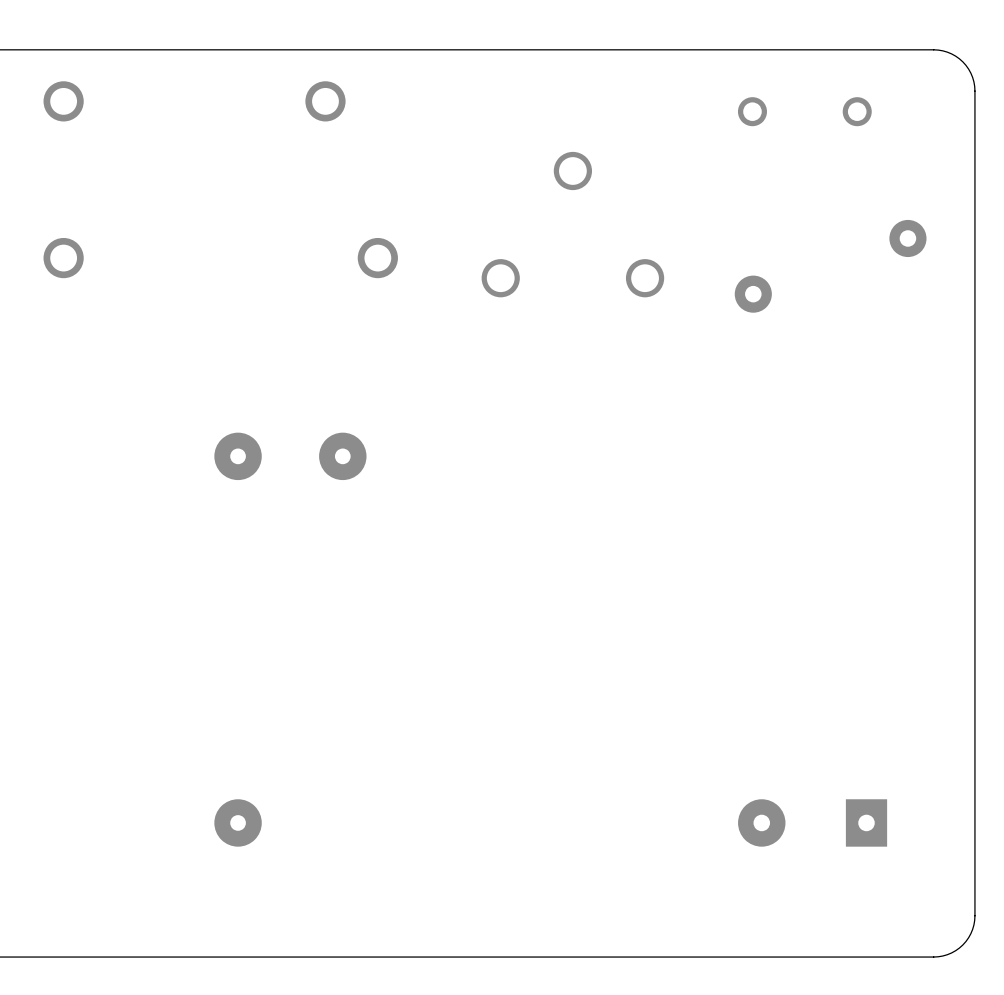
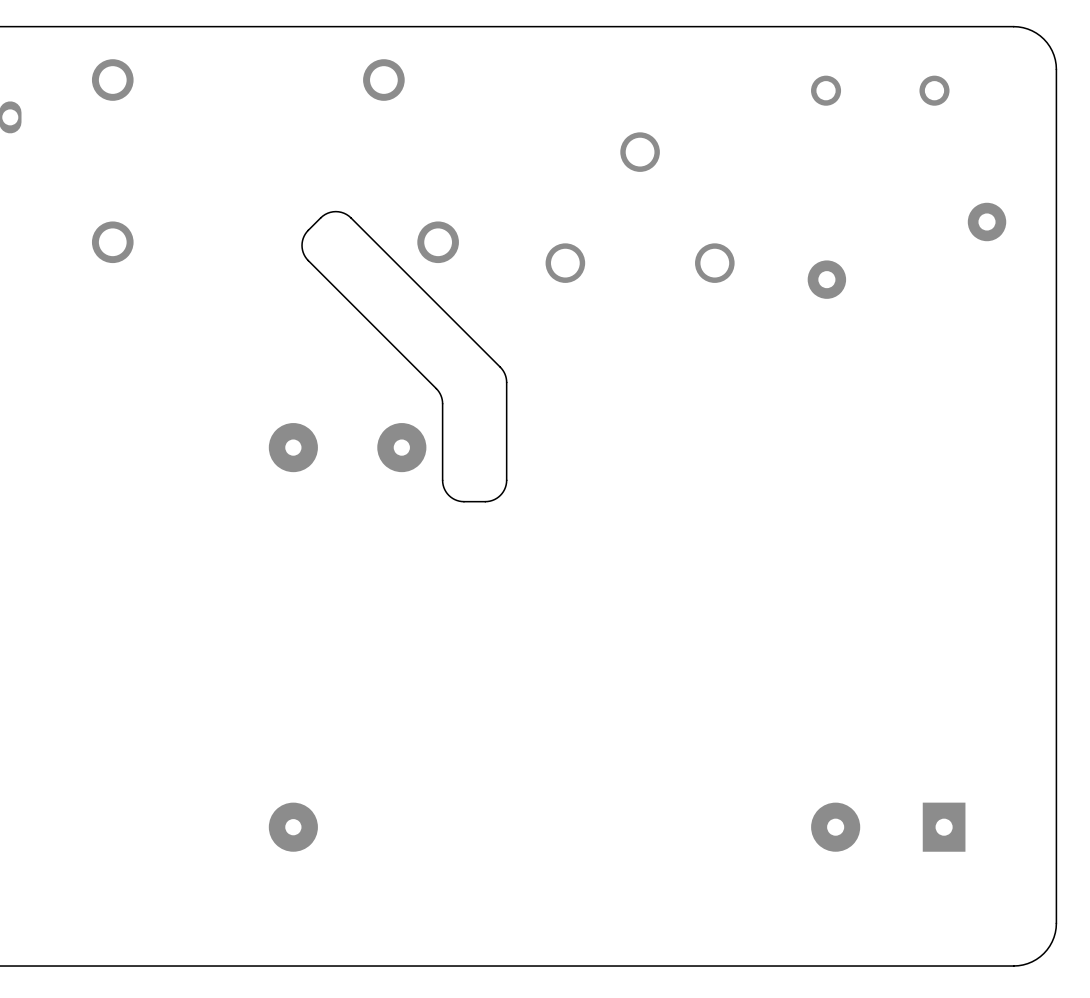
board edge: none -> (350, 217) (504, 372) (506, 382) (506, 482) (502, 493) (494, 499) (487, 501) (461, 501) (454, 499) (447, 493) (442, 482) (442, 403) (440, 393) (304, 254) (302, 245) (304, 236) (322, 216) (330, 212) (338, 211) (350, 217)

